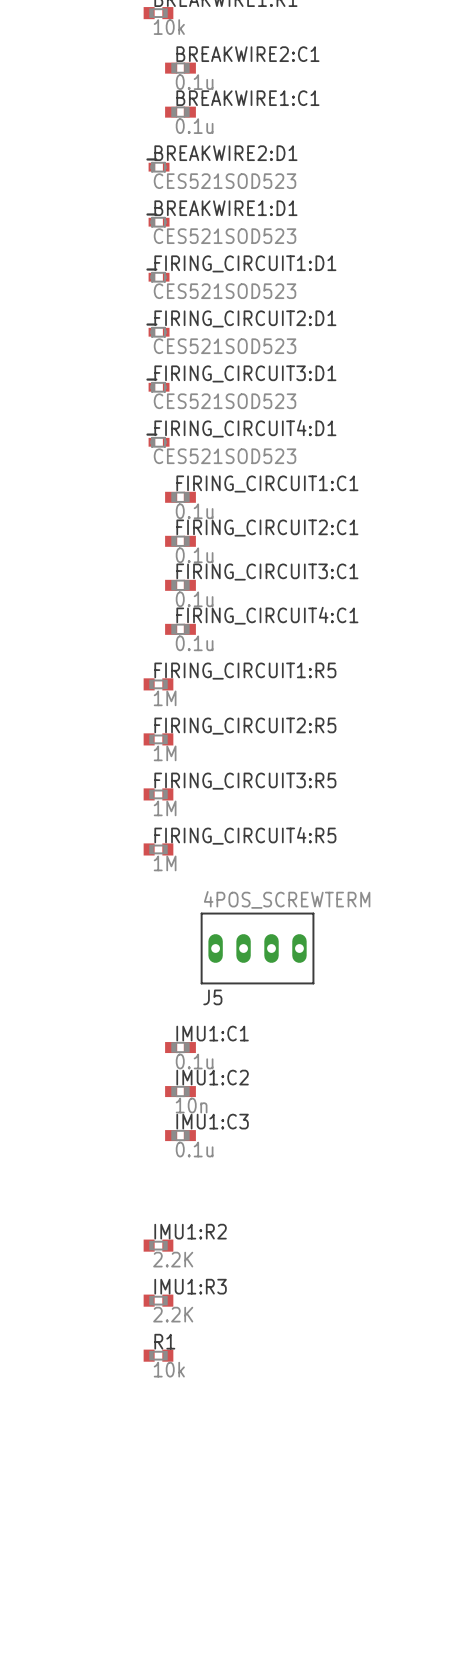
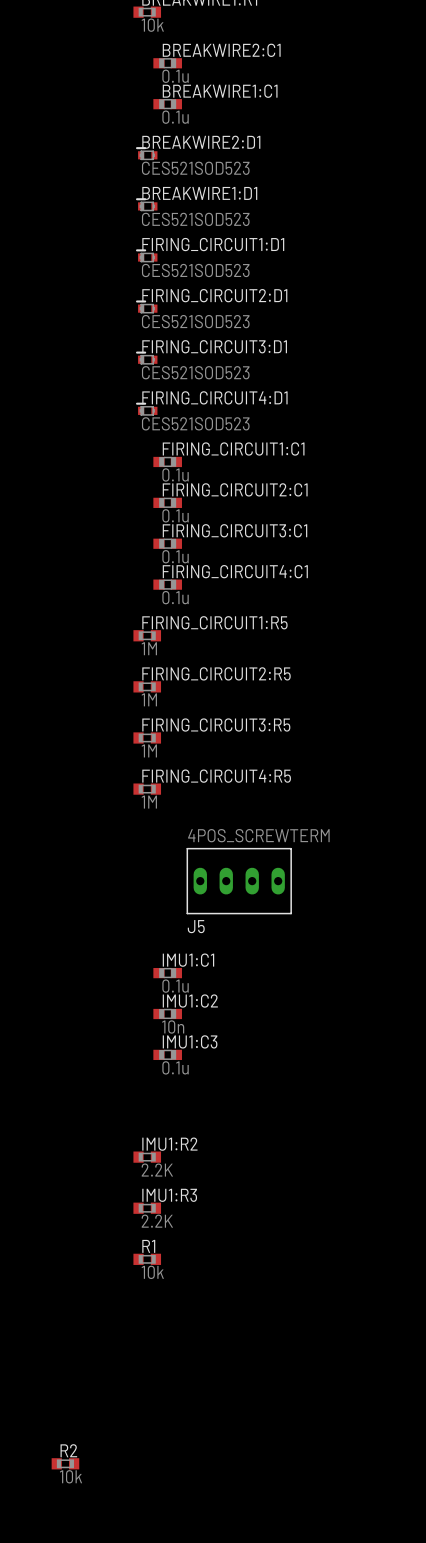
R2: none -> 10k (65, 1463)

